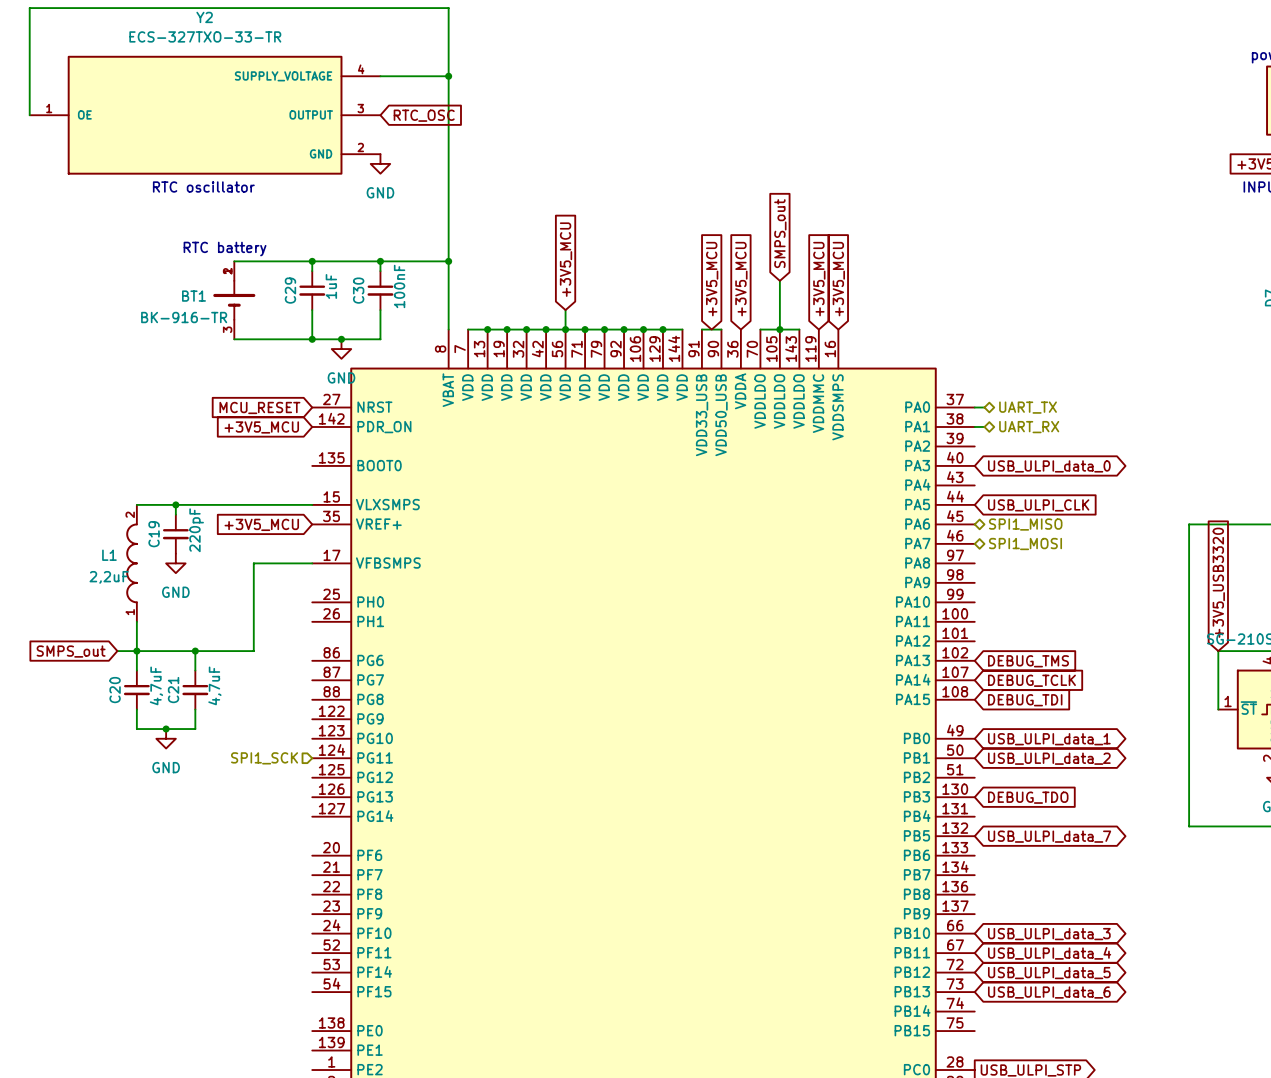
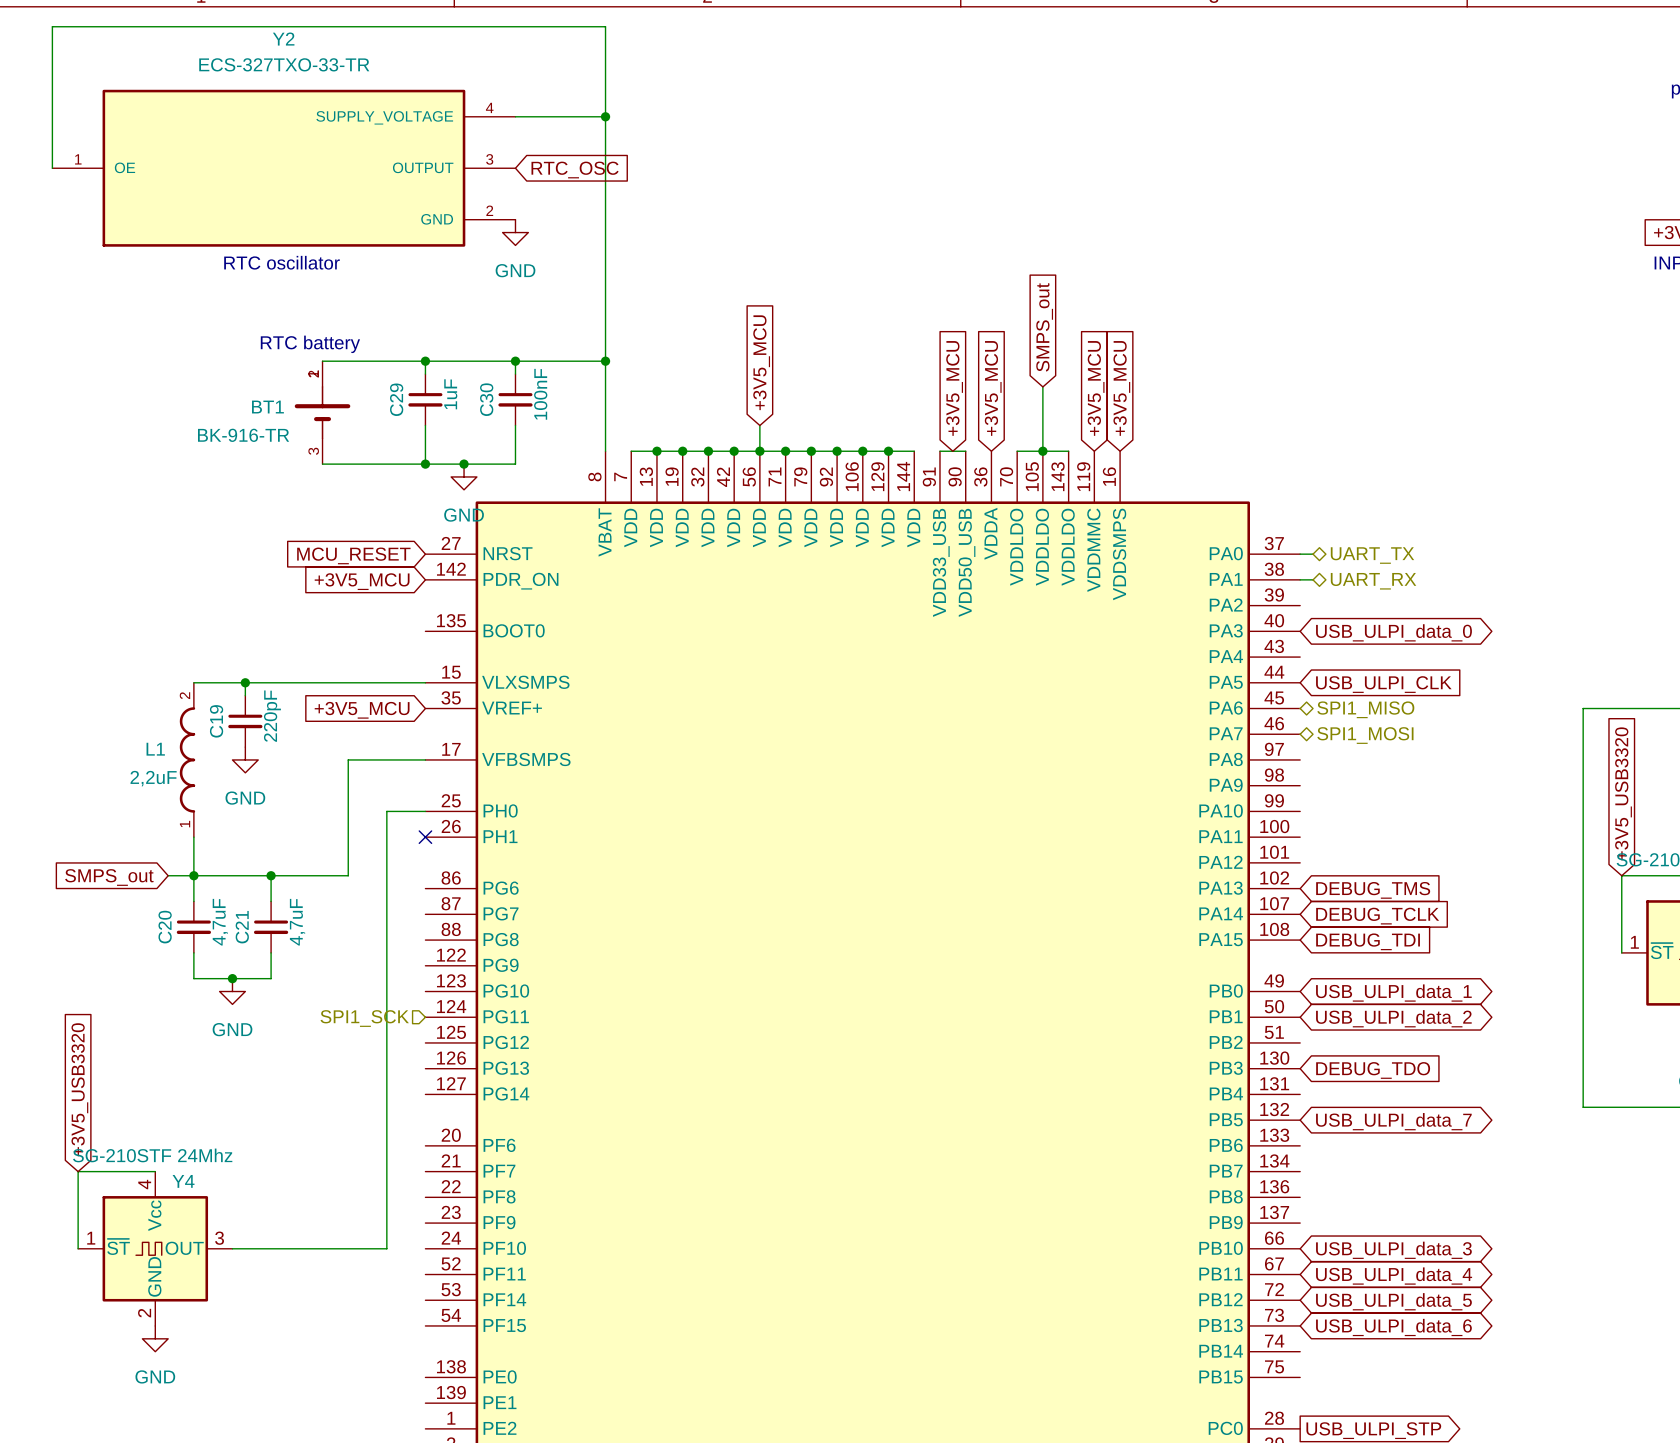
wire: none -> (425, 811) (386, 811) (386, 1248) (232, 1248)
no-connect mark: none -> (425, 837)
global label: none -> +3V5_USB3320 (79, 1089)
wire: none -> (155, 1171) (78, 1171) (78, 1248)
Y4: none -> SG-210STF 24Mhz (155, 1248)
power symbol: none -> GND (155, 1338)

